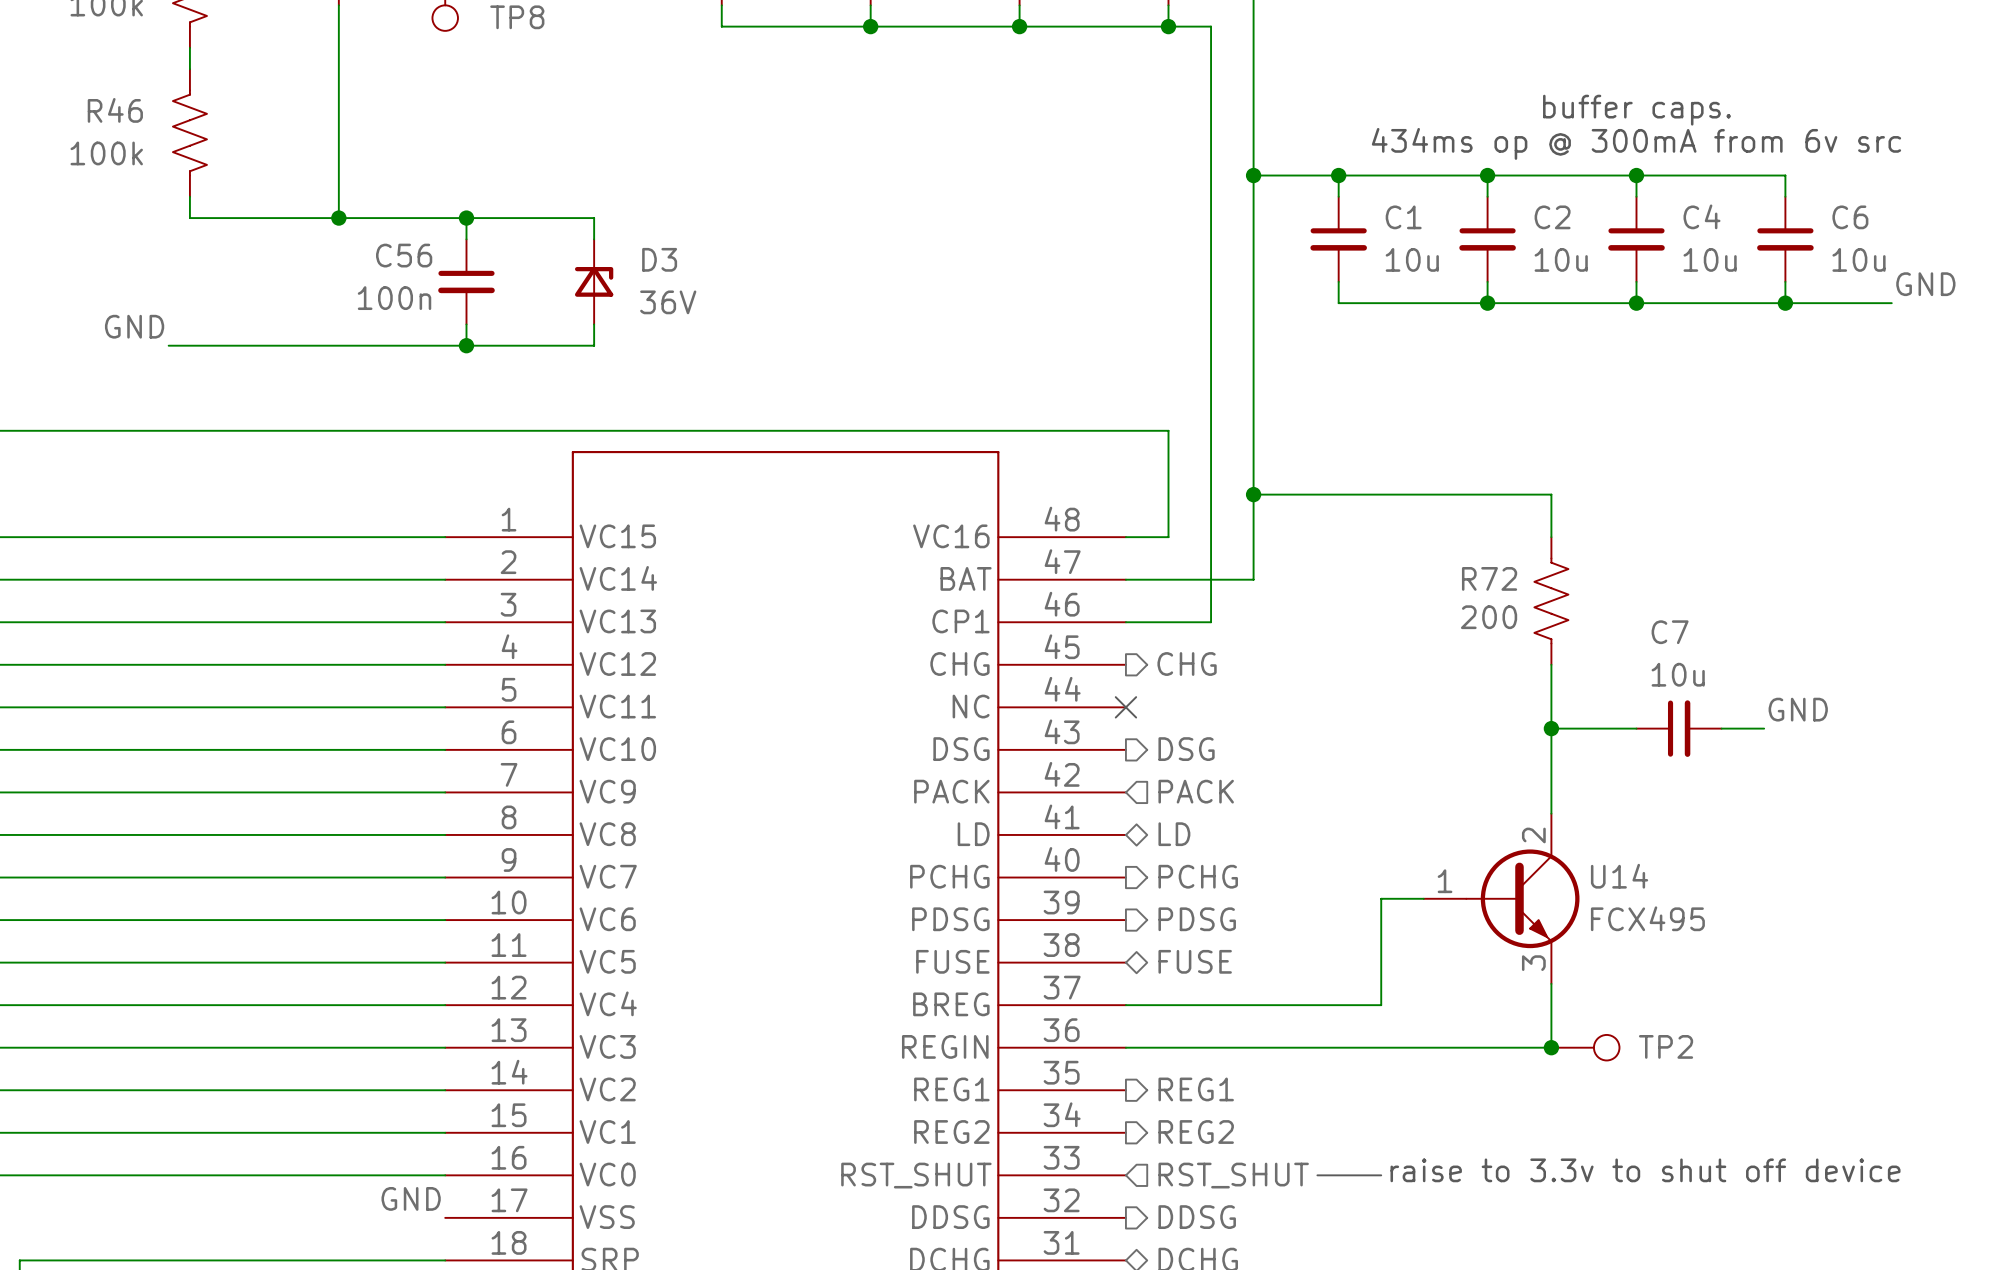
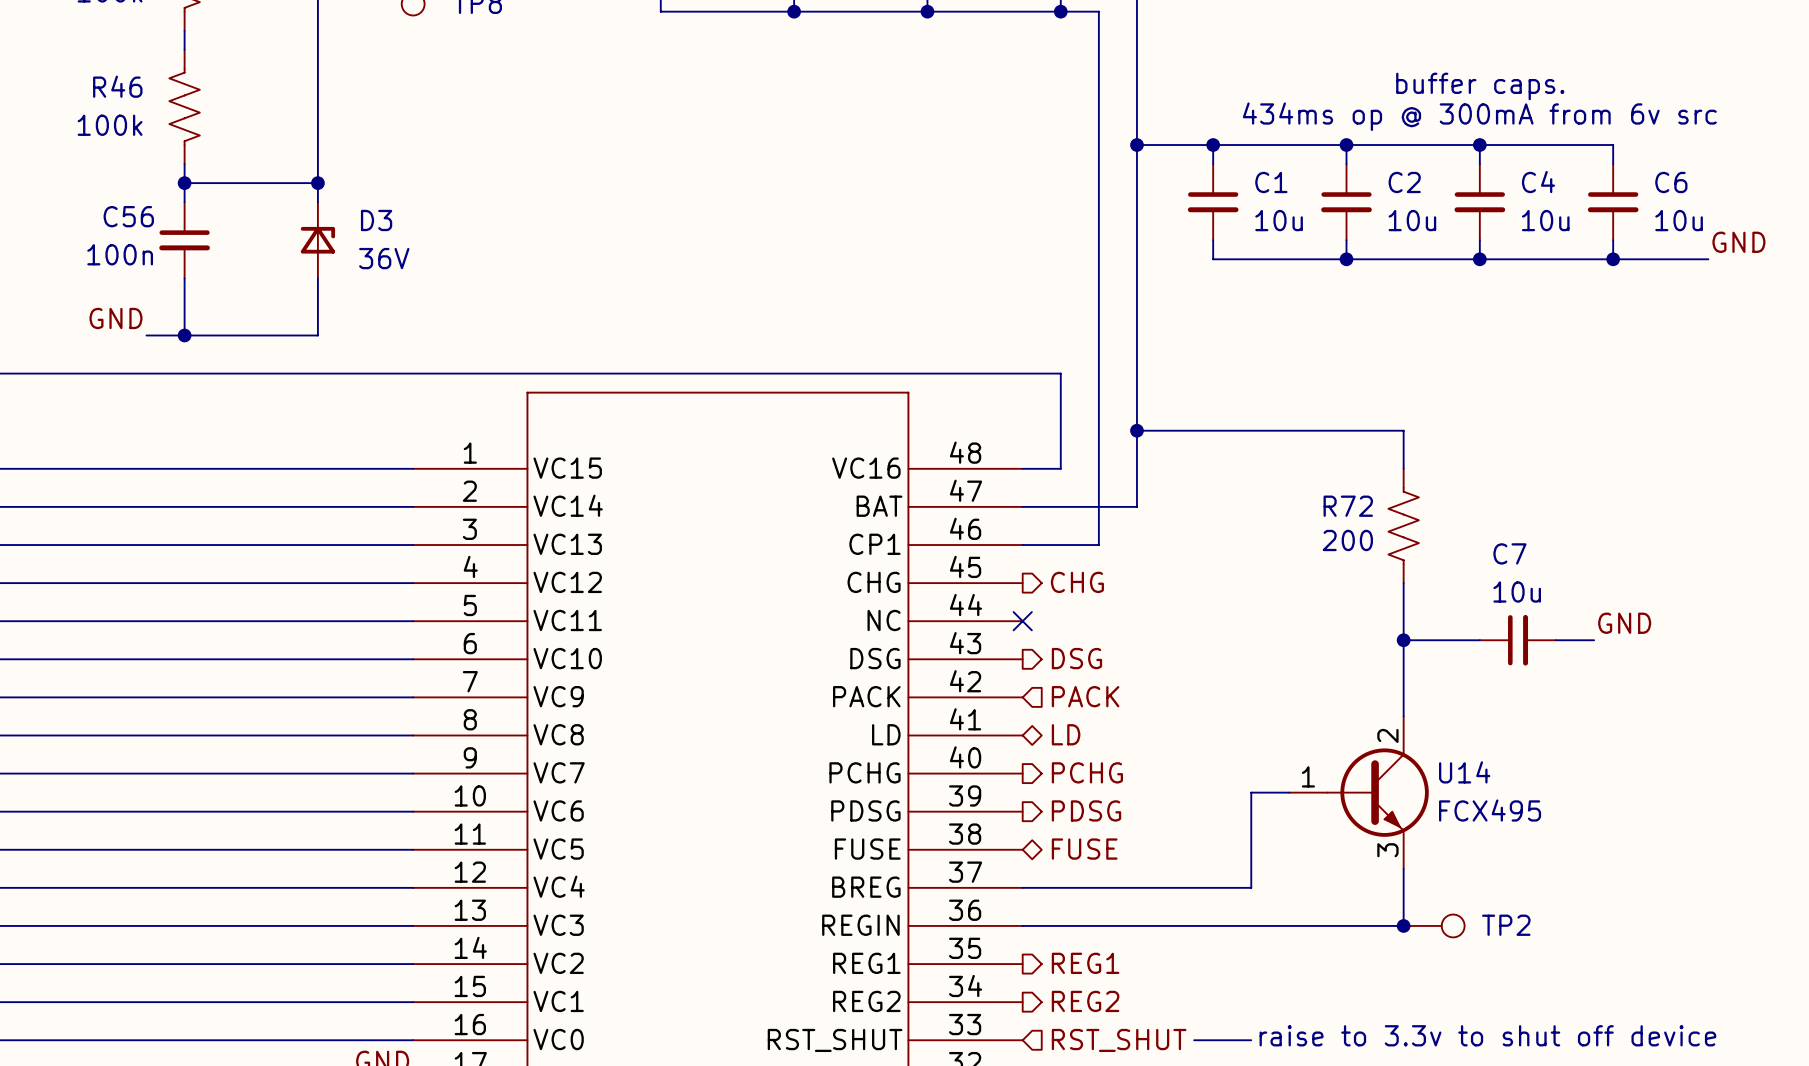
junction: none -> (184, 183)
wire: (338, 218) (594, 218) (594, 239) -> (317, 183) (317, 202)
wire: (466, 218) (466, 239) -> (184, 183) (184, 202)
junction: (466, 218) -> none
C56 position: (466, 281) -> (184, 240)
D3 position: (594, 281) -> (317, 240)
wire: none -> (184, 278) (184, 335)
wire: none -> (317, 278) (317, 335) (146, 335)
wire: (466, 324) (466, 345) -> none
wire: (594, 324) (594, 345) (168, 345) -> none
label position: GND (134, 326) -> GND (115, 318)
junction: (466, 345) -> none
junction: none -> (184, 335)

